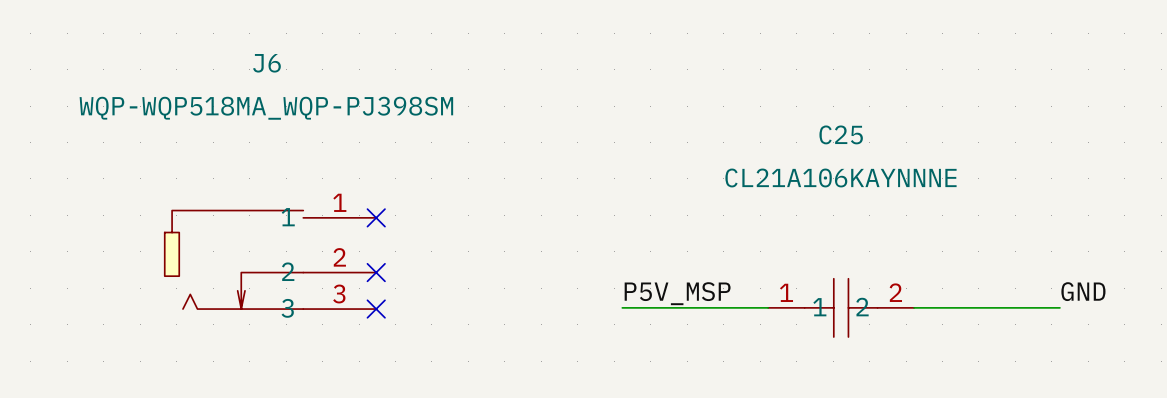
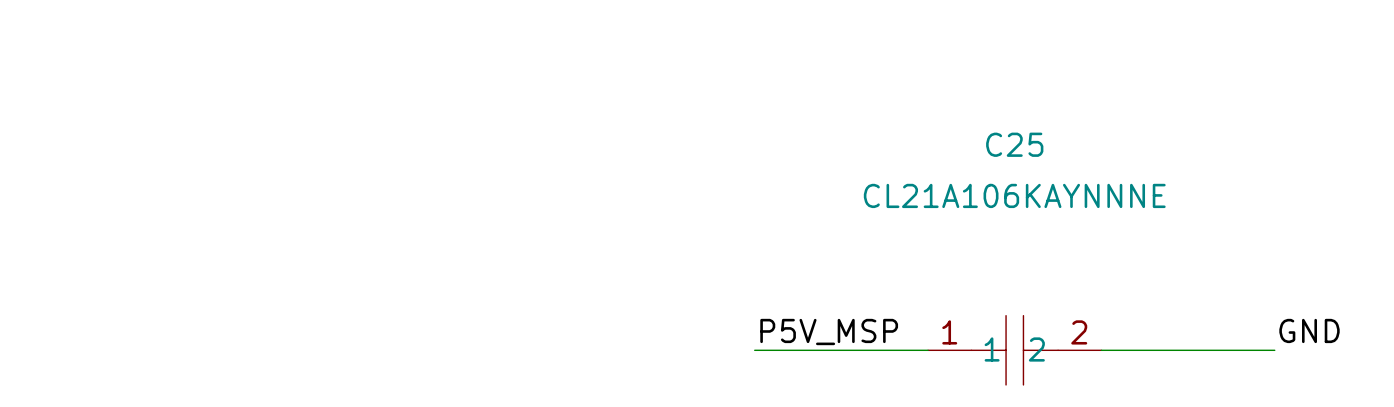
no-connect mark: (376, 217) -> none
J6: WQP-WQP518MA_WQP-PJ398SM (270, 259) -> none
no-connect mark: (376, 272) -> none
no-connect mark: (376, 309) -> none

